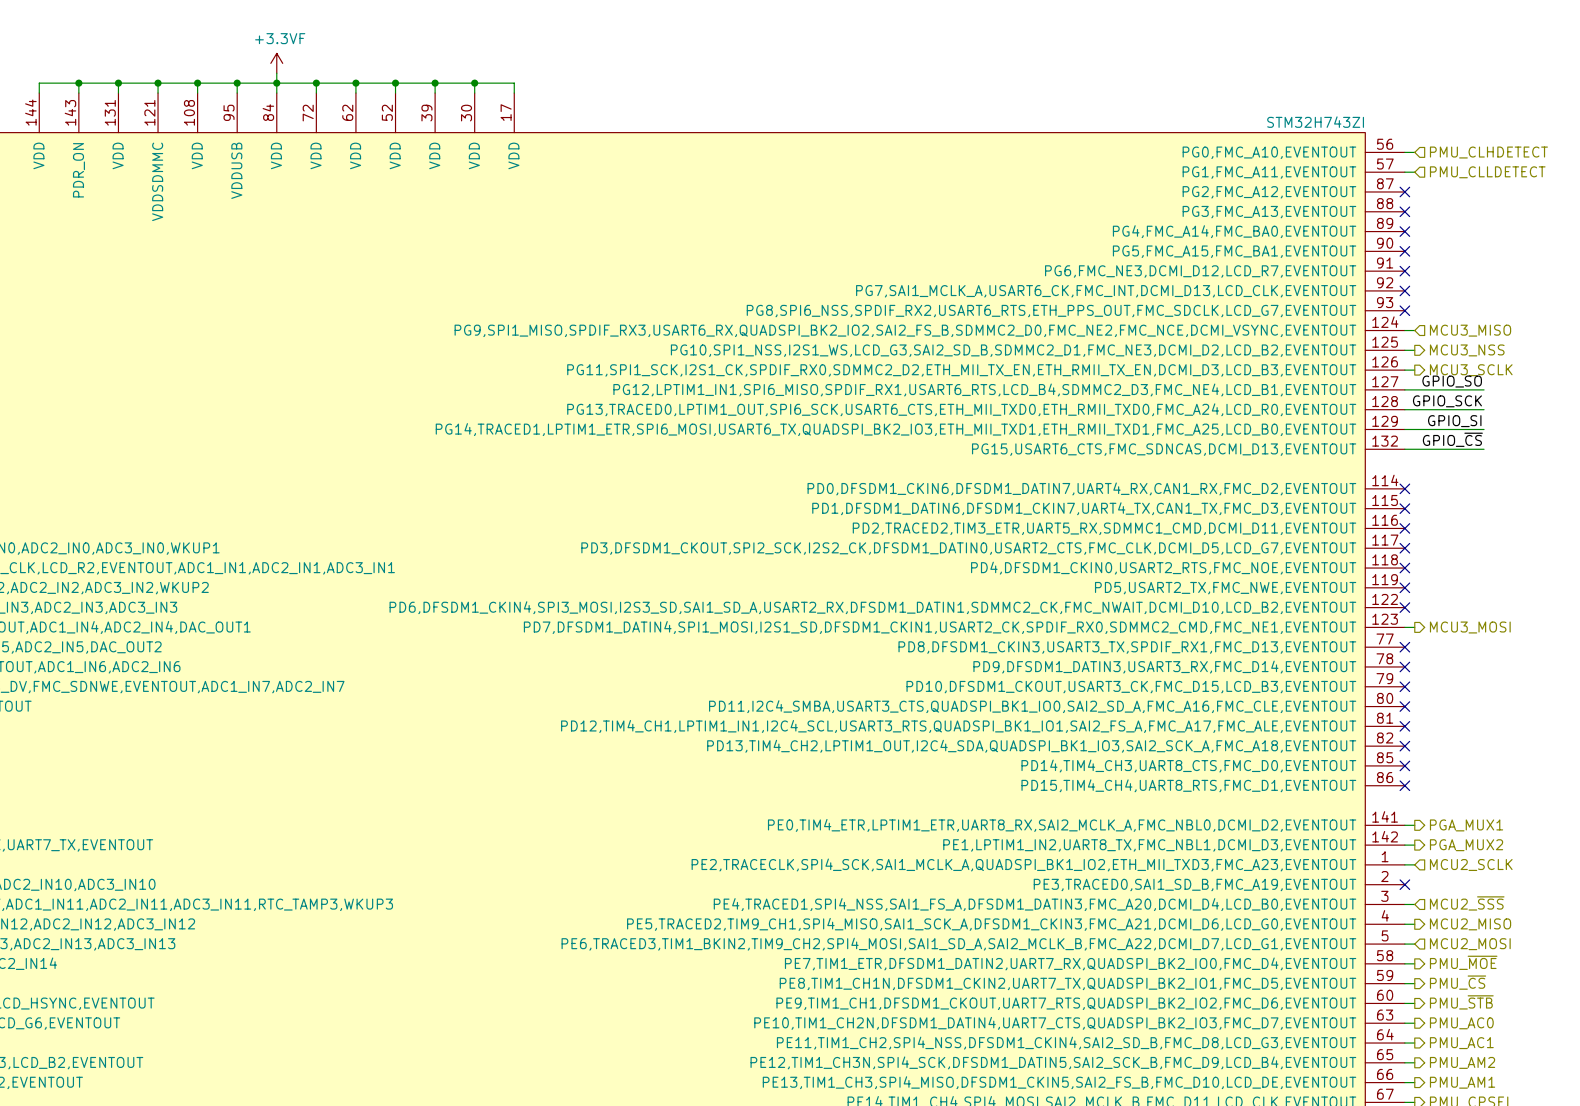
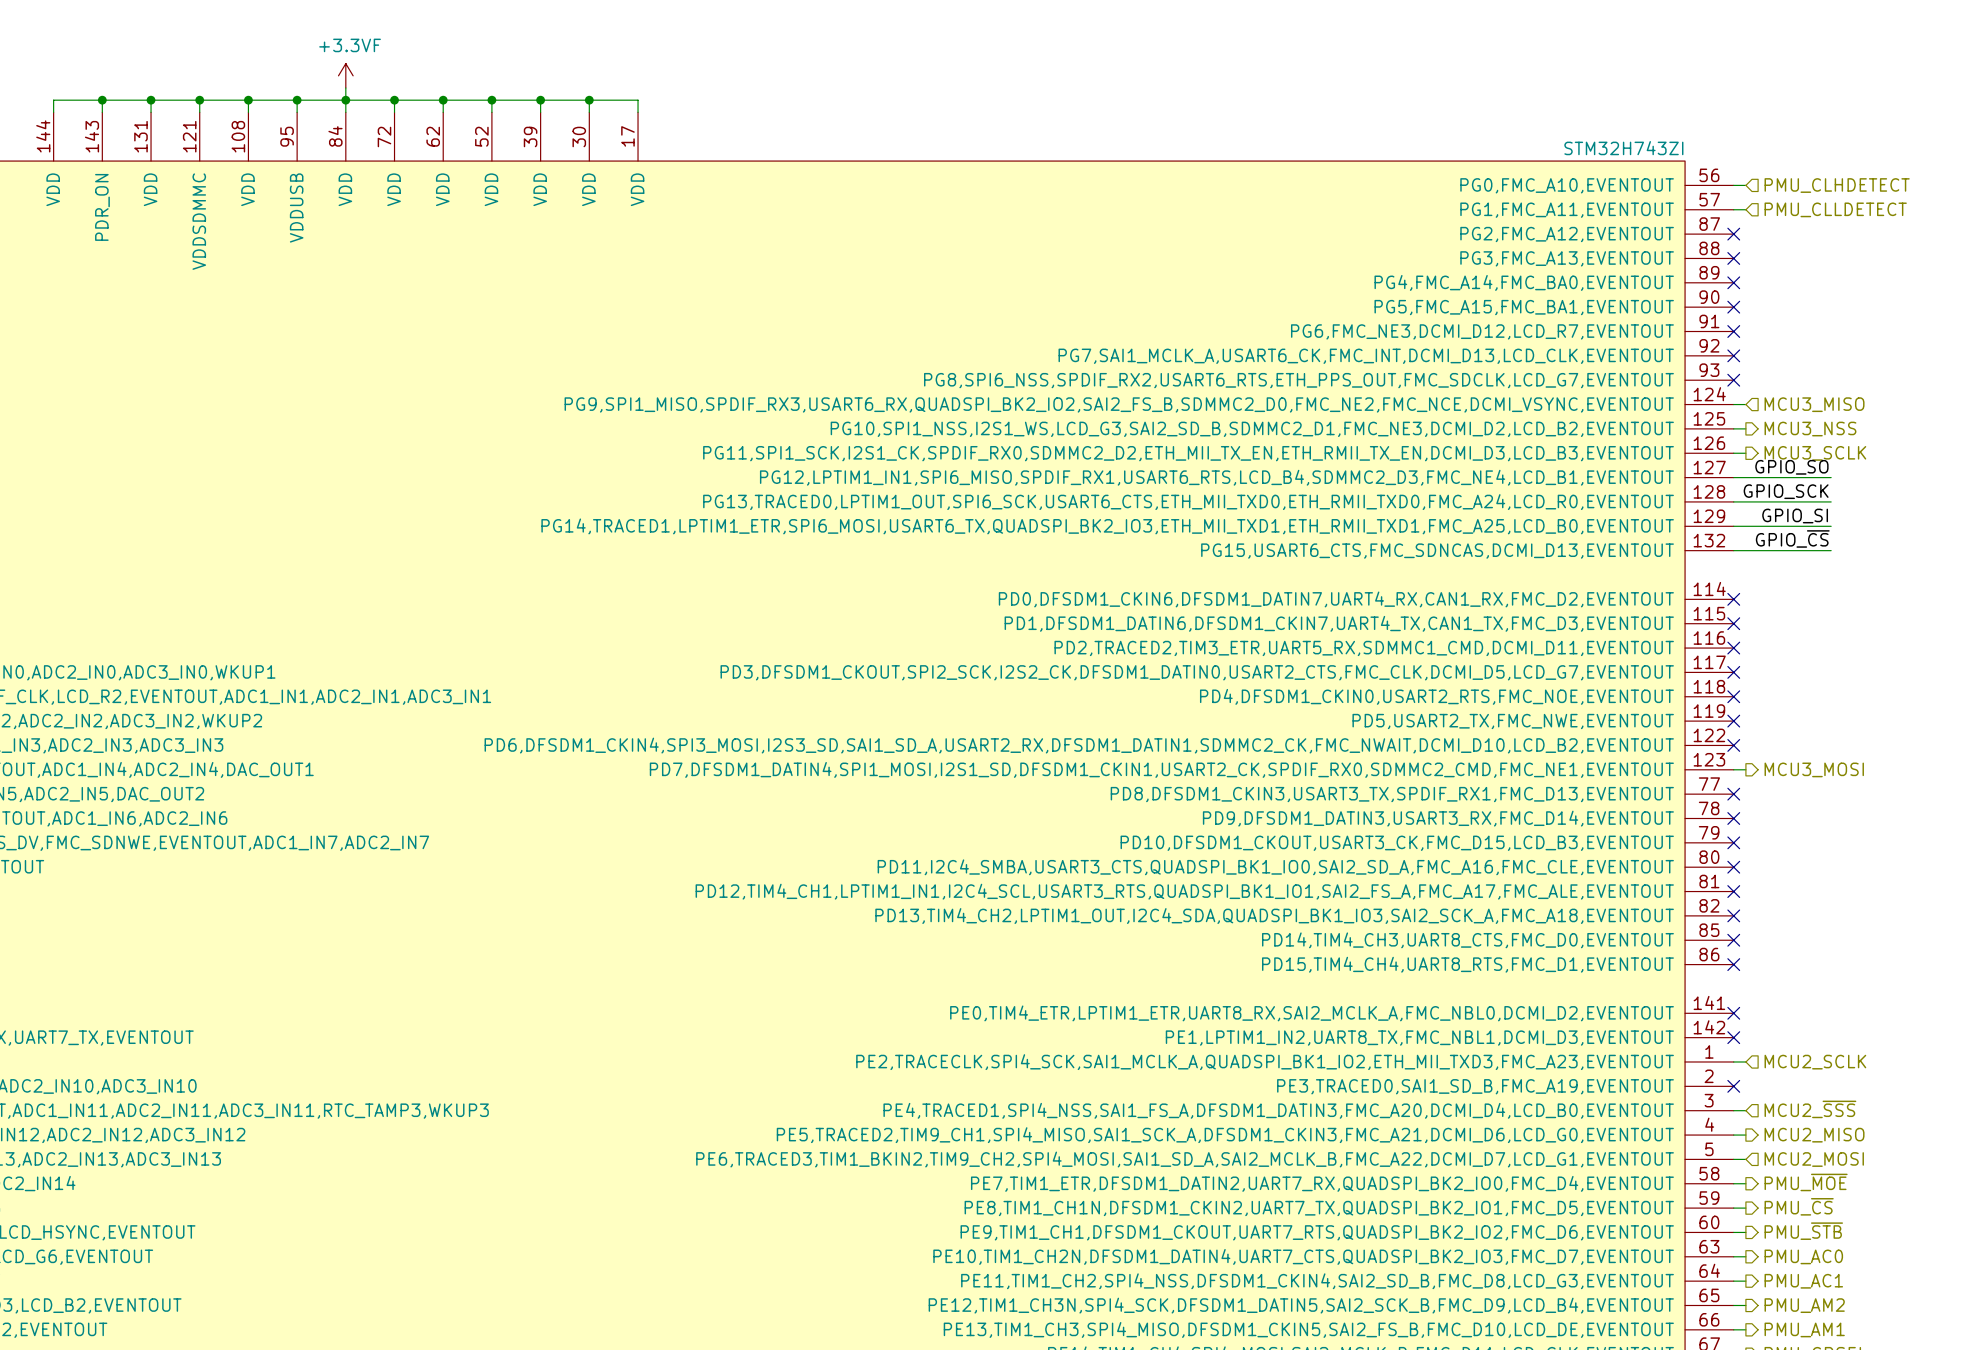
wire: (1404, 825) (1414, 825) -> none
no-connect mark: none -> (1733, 1013)
hierarchical label: PGA_MUX1 (1466, 825) -> none
wire: (1404, 845) (1414, 845) -> none
no-connect mark: none -> (1733, 1037)
hierarchical label: PGA_MUX2 (1466, 845) -> none

